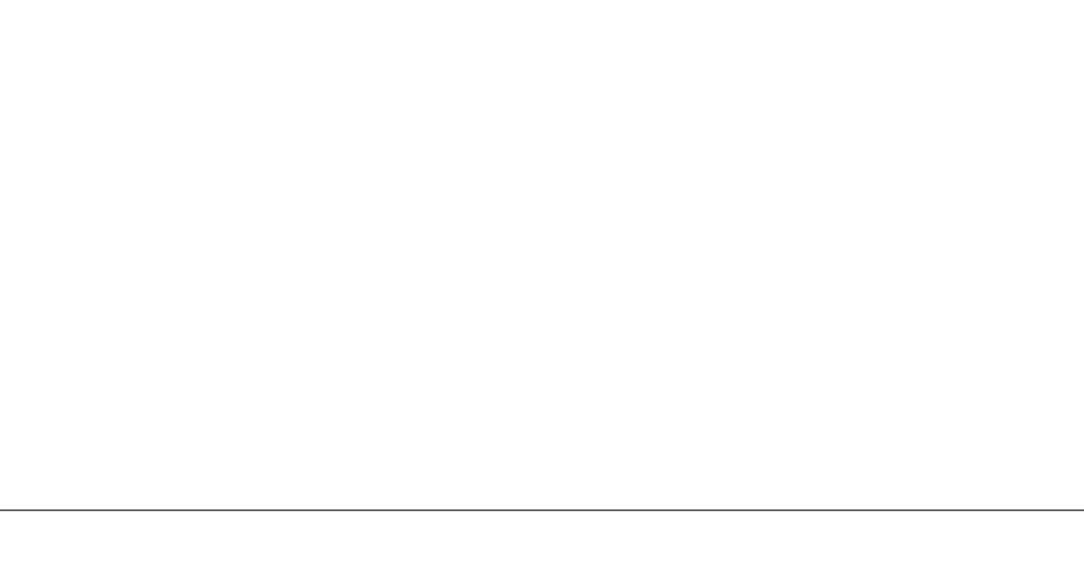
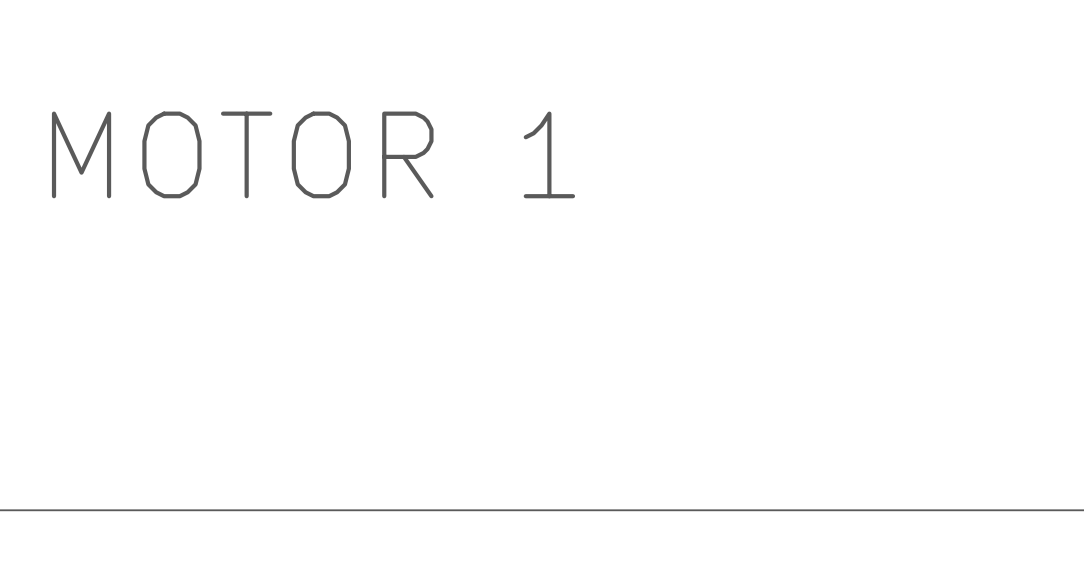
text: none -> MOTOR 1 (313, 154)

